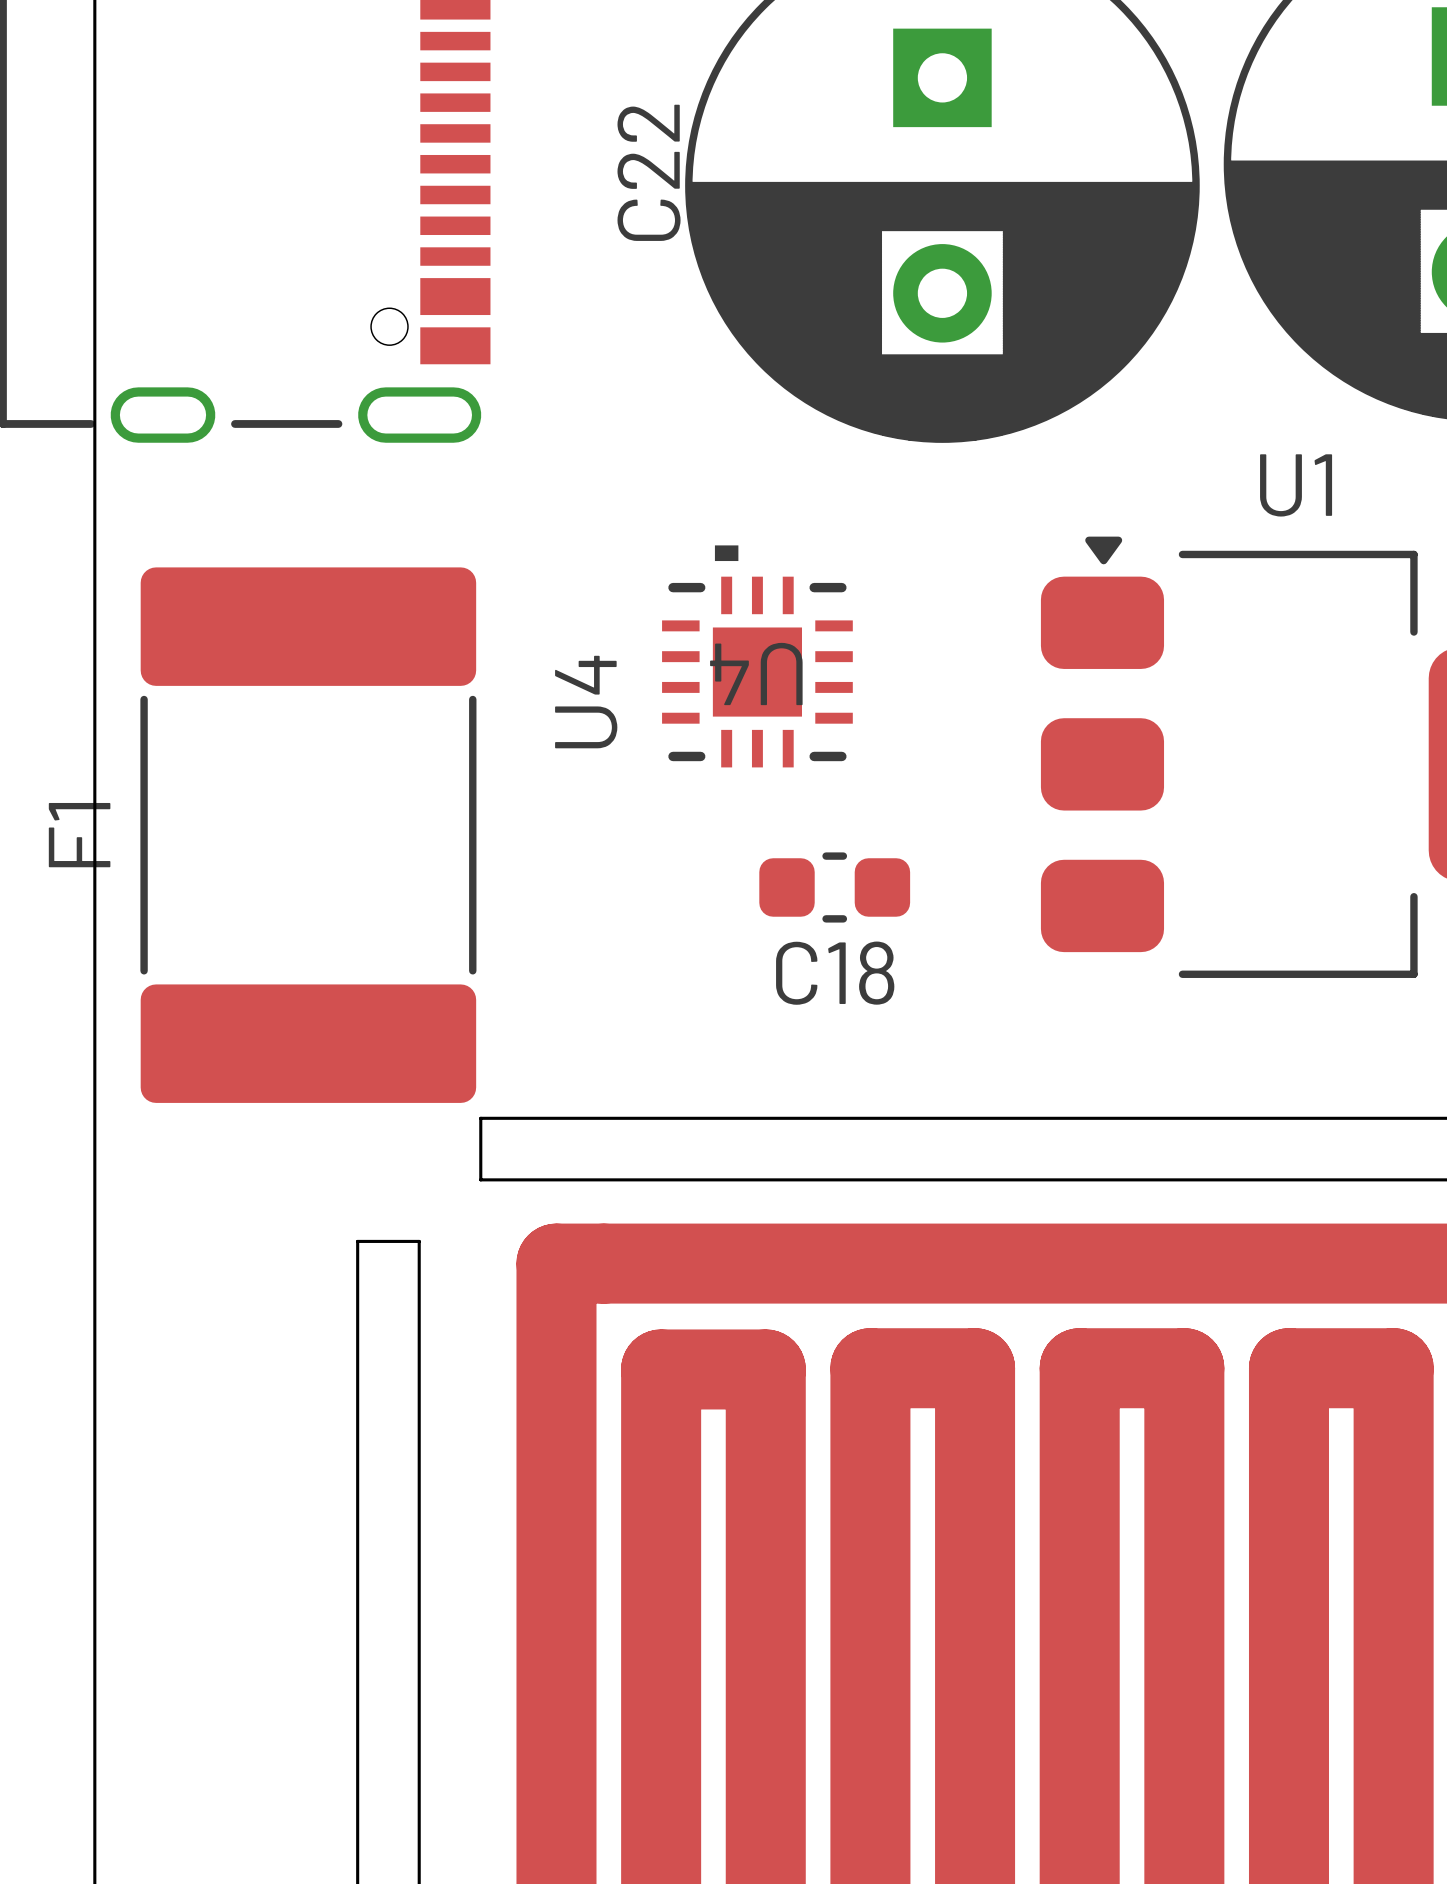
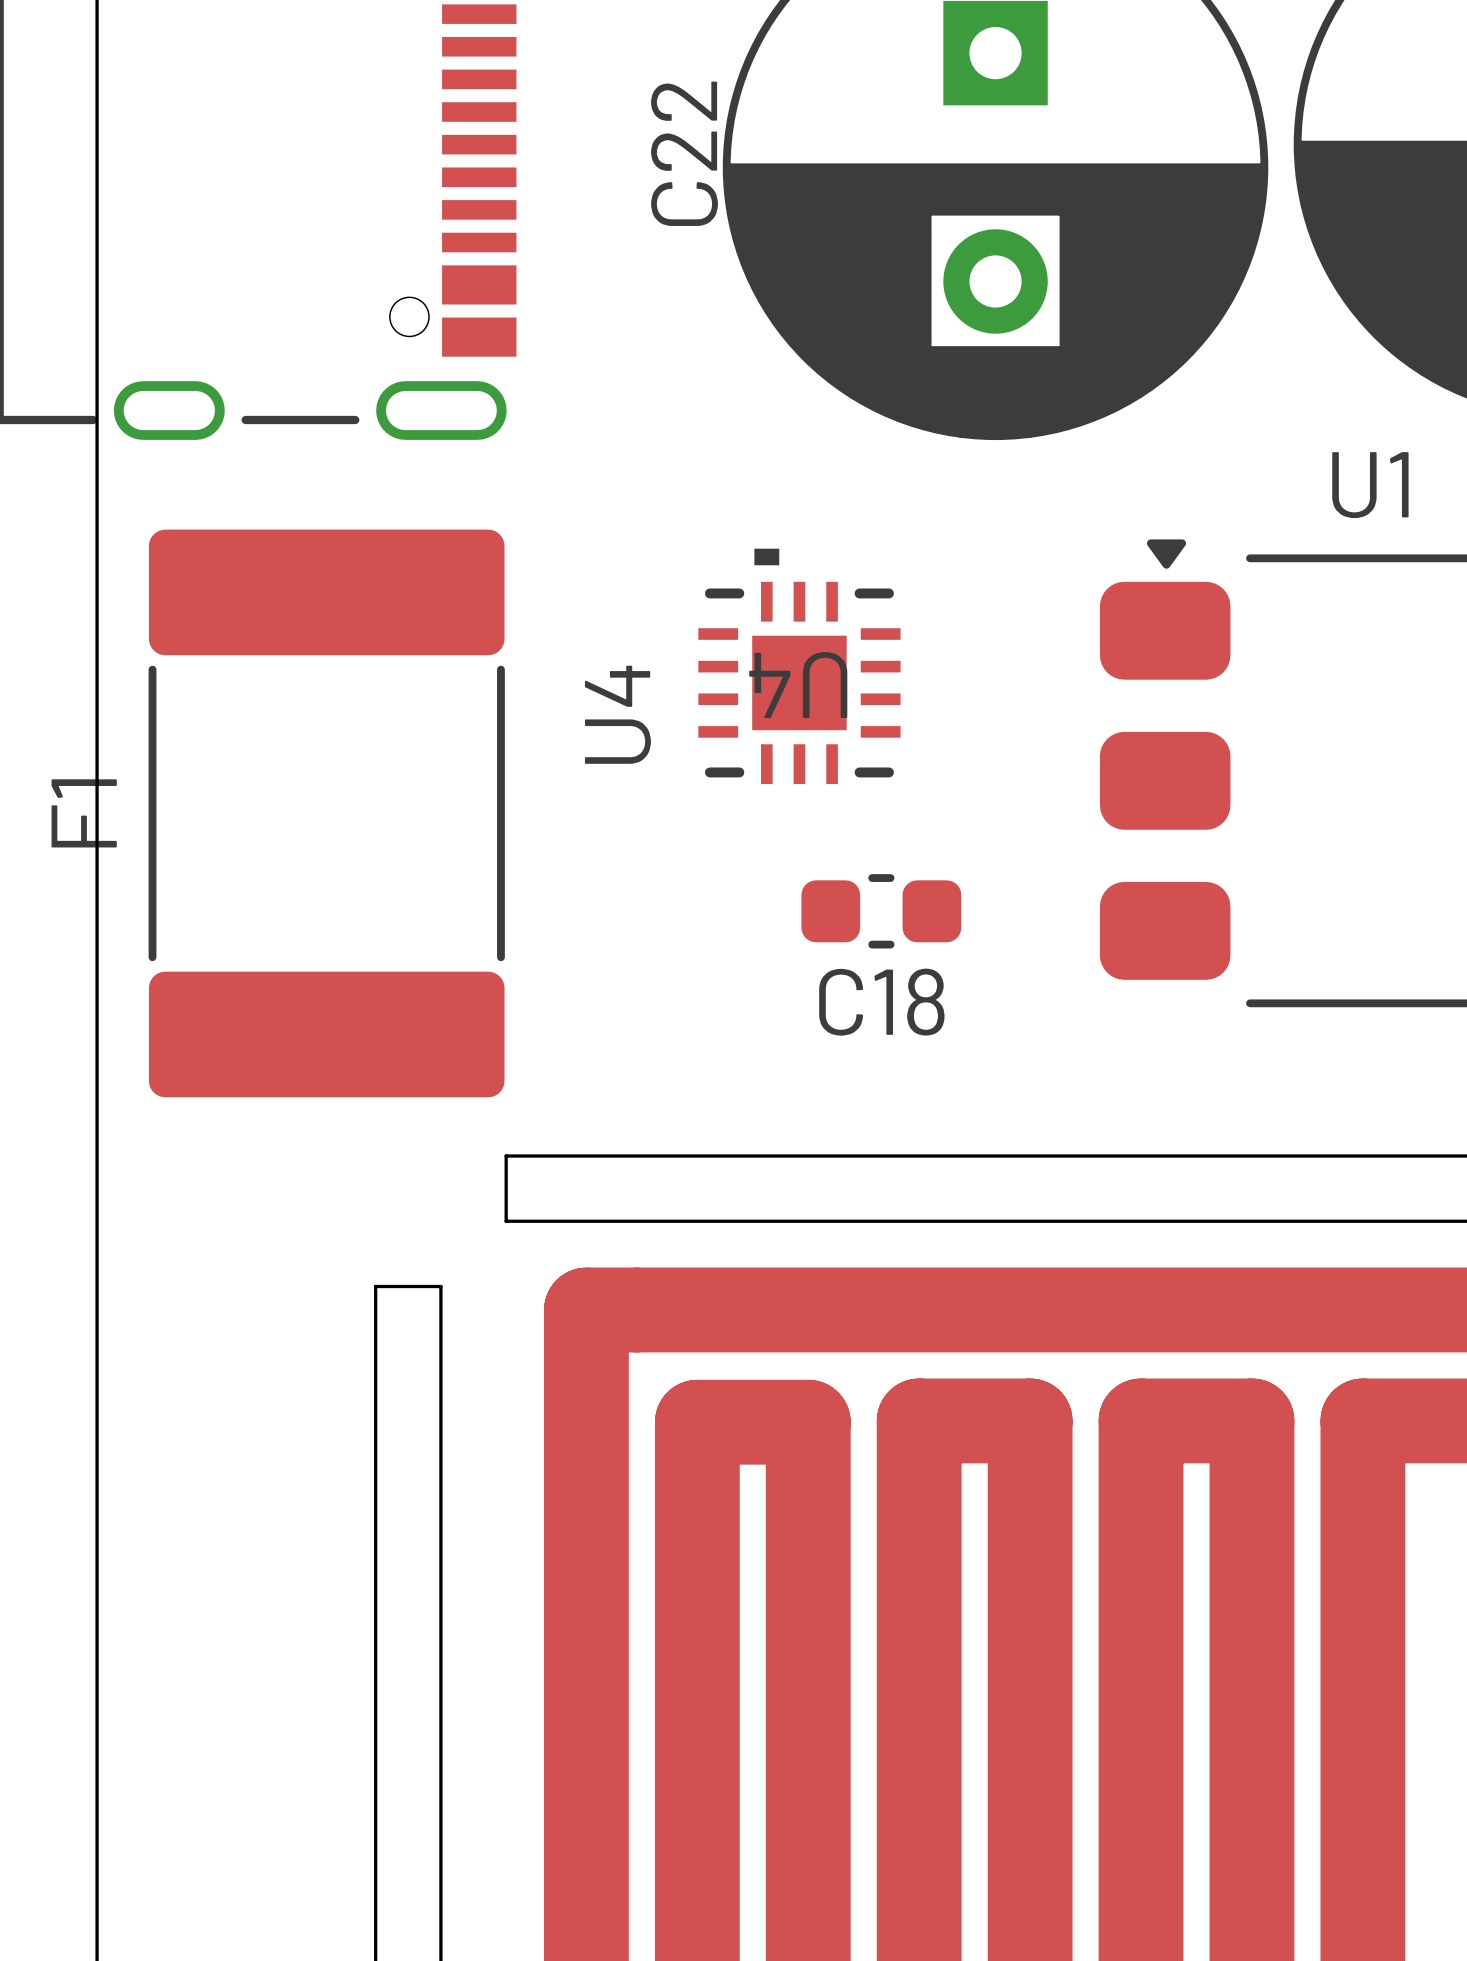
F1 position: (308, 835) -> (326, 813)

